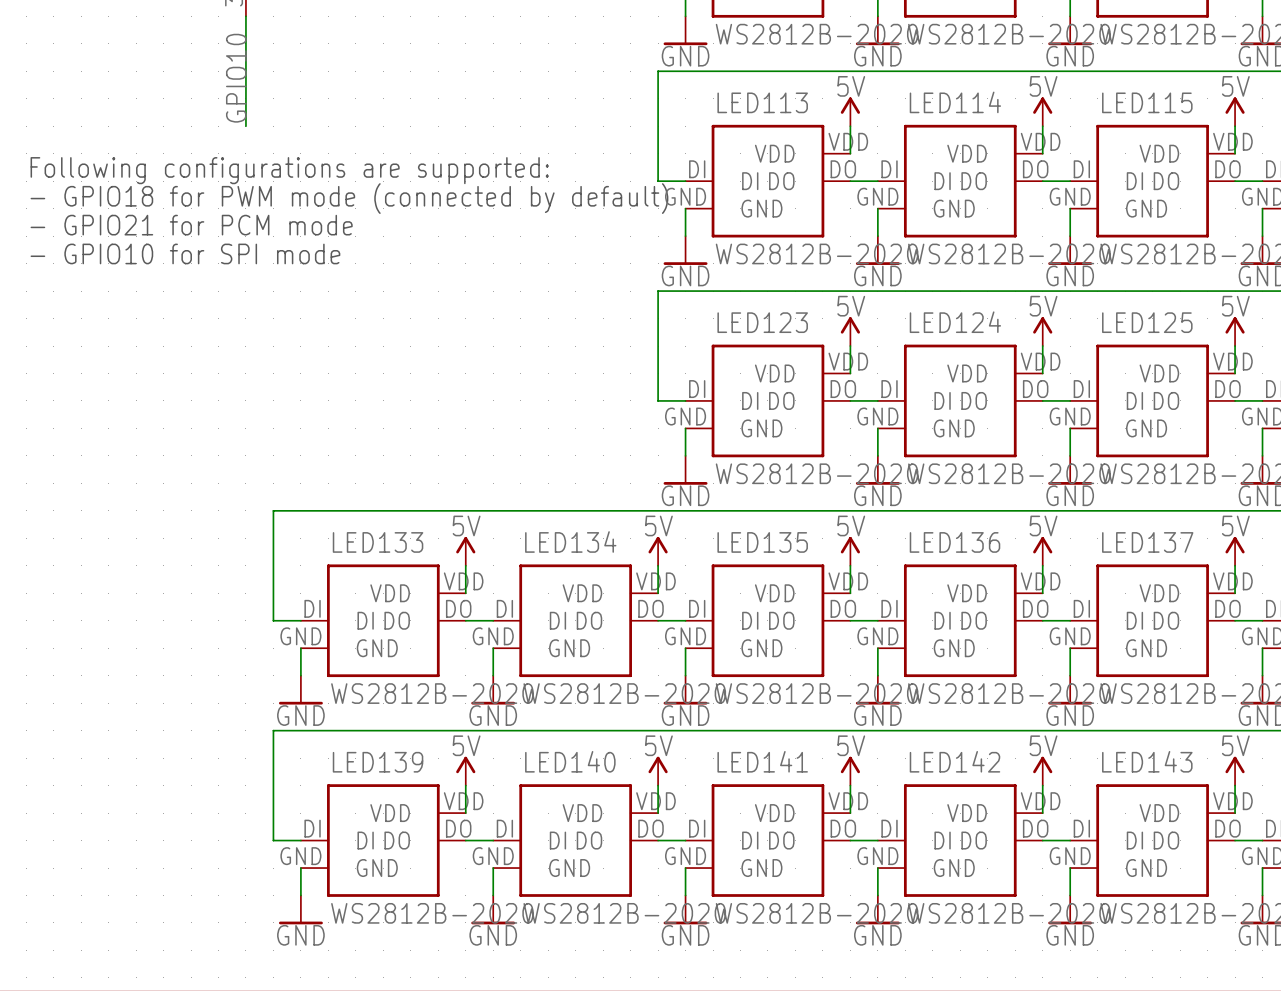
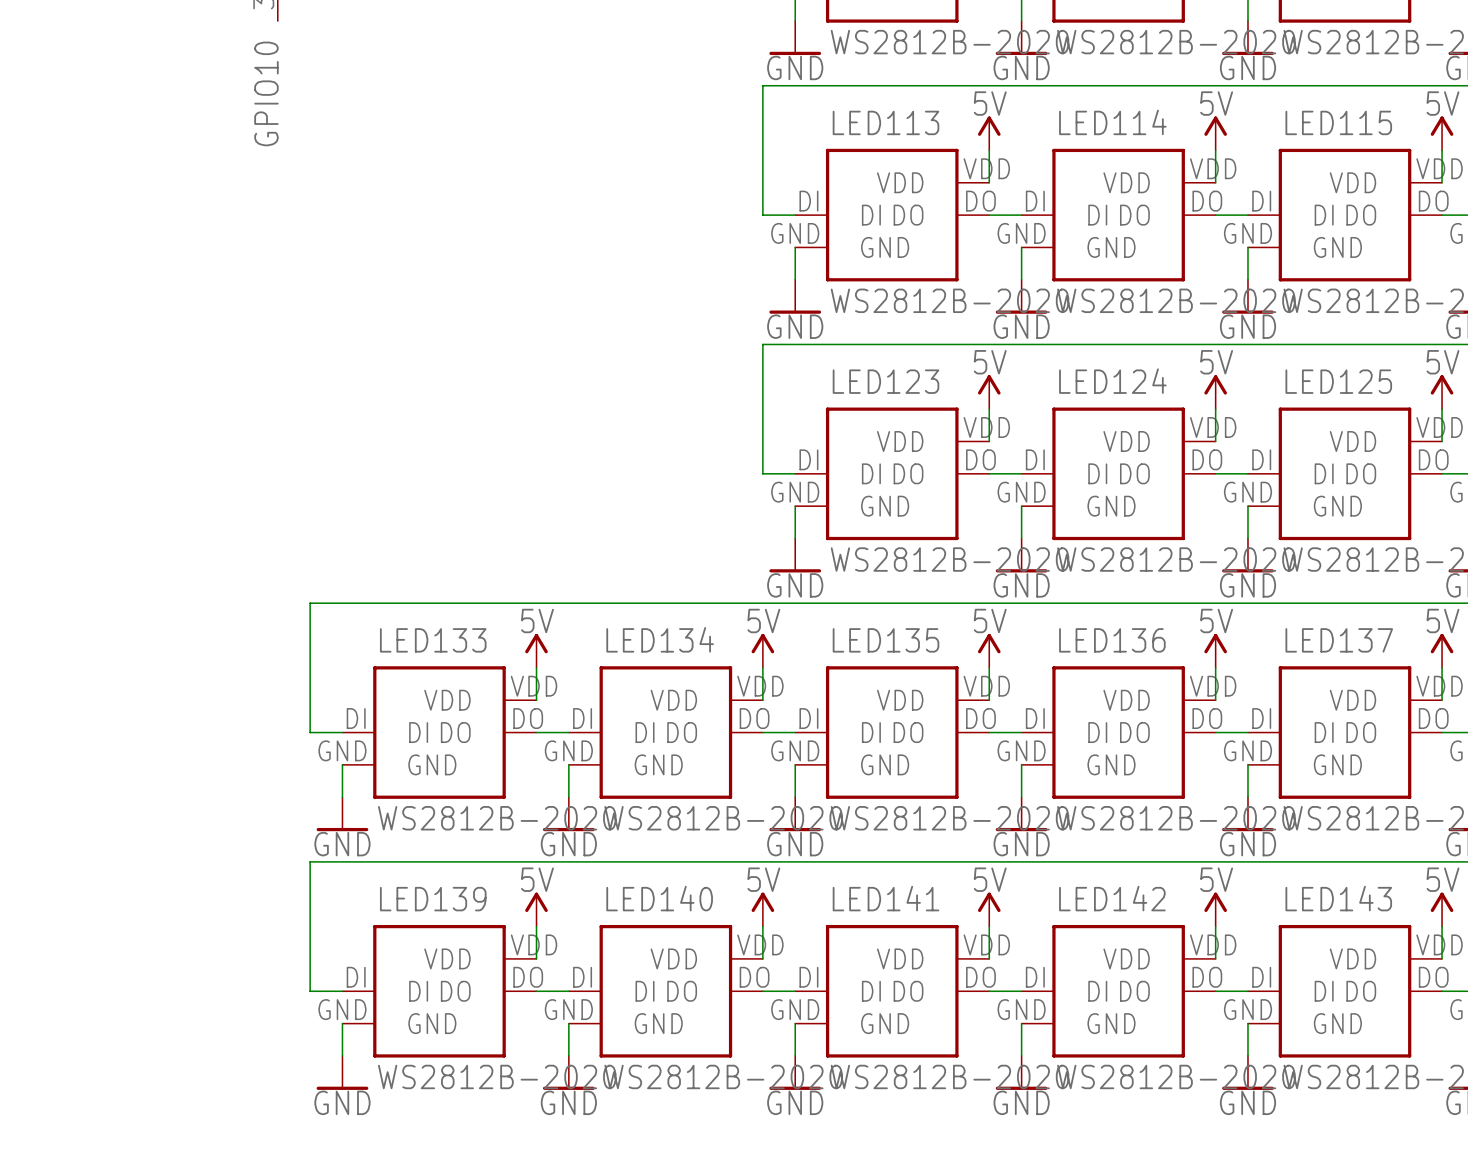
wire: (245, 16) (245, 126) -> none
text: Following configurations are supported: (289, 170) -> none
text: - GPIO18 for PWM mode (connected by default) (349, 198) -> none
text: - GPIO21 for PCM mode (191, 225) -> none
text: - GPIO10 for SPI mode (185, 253) -> none

